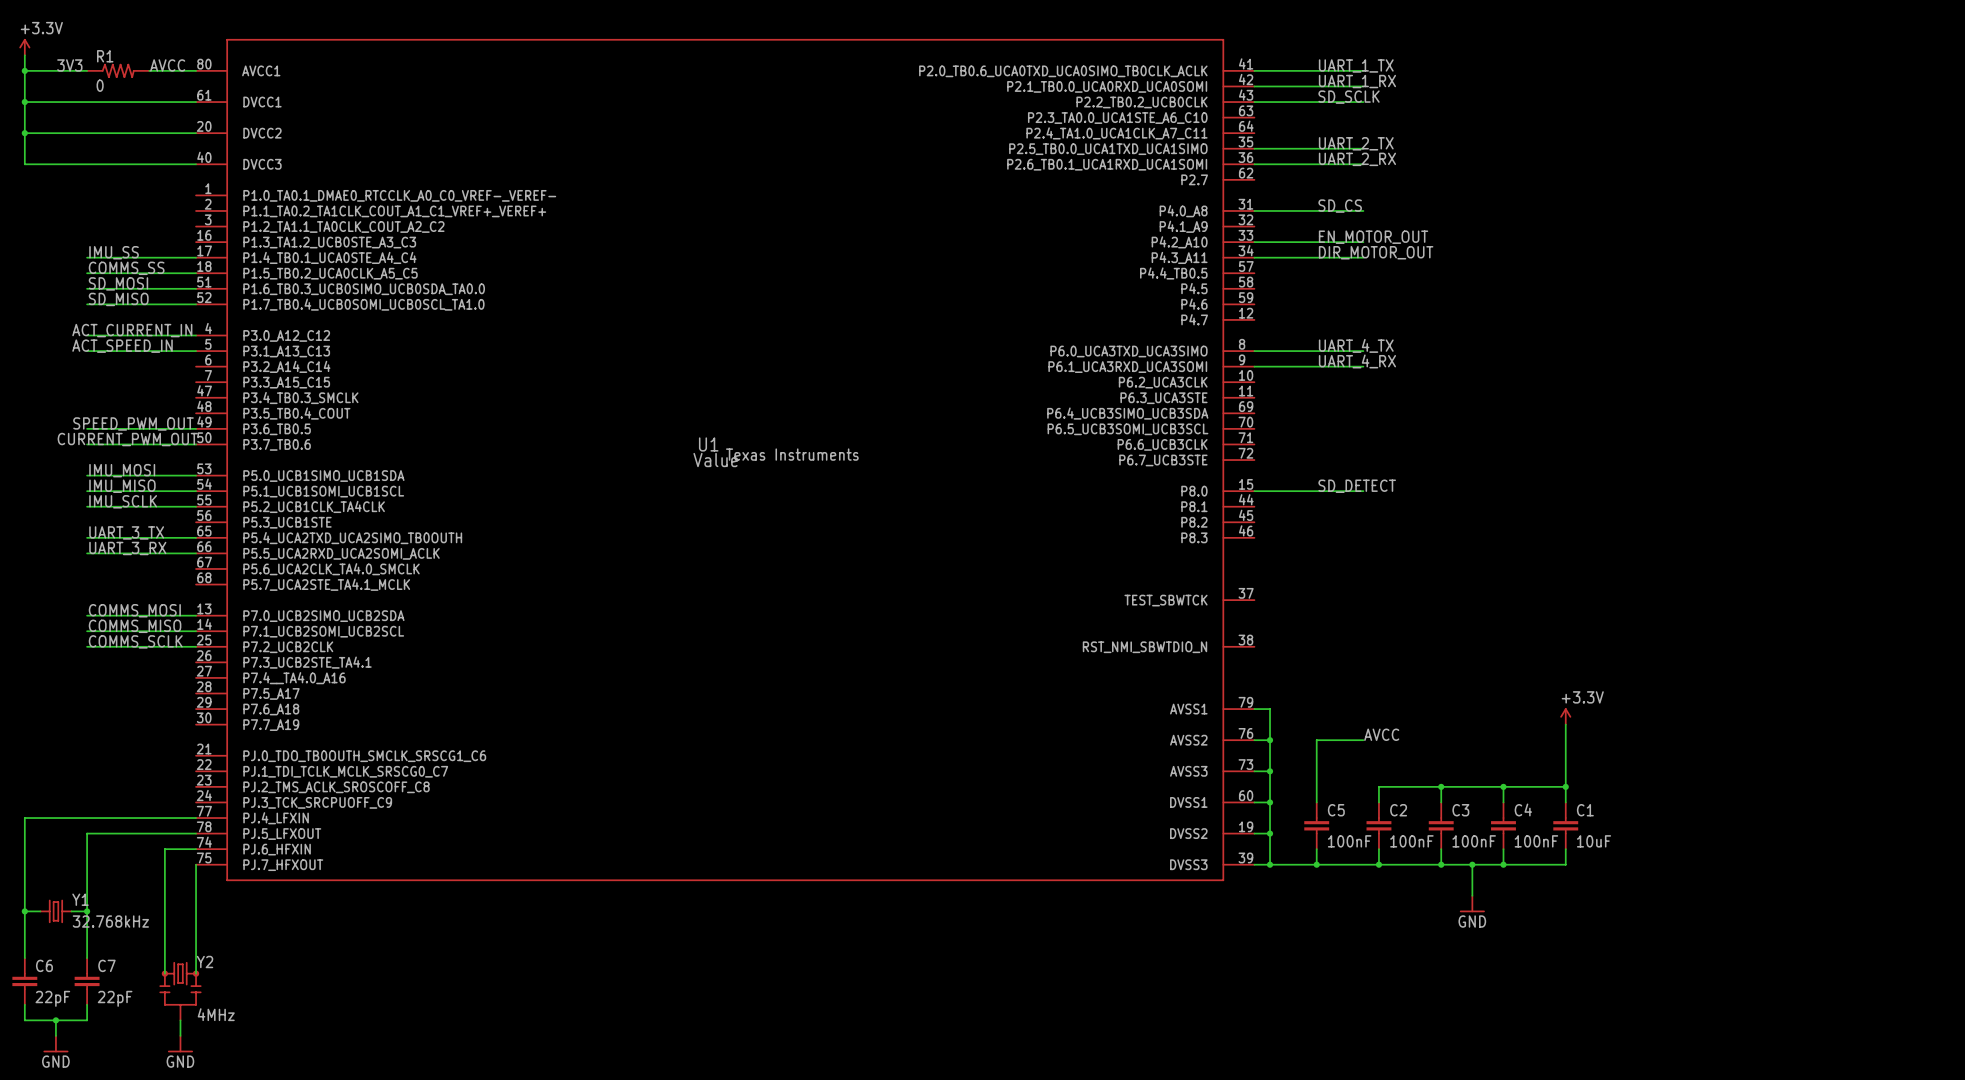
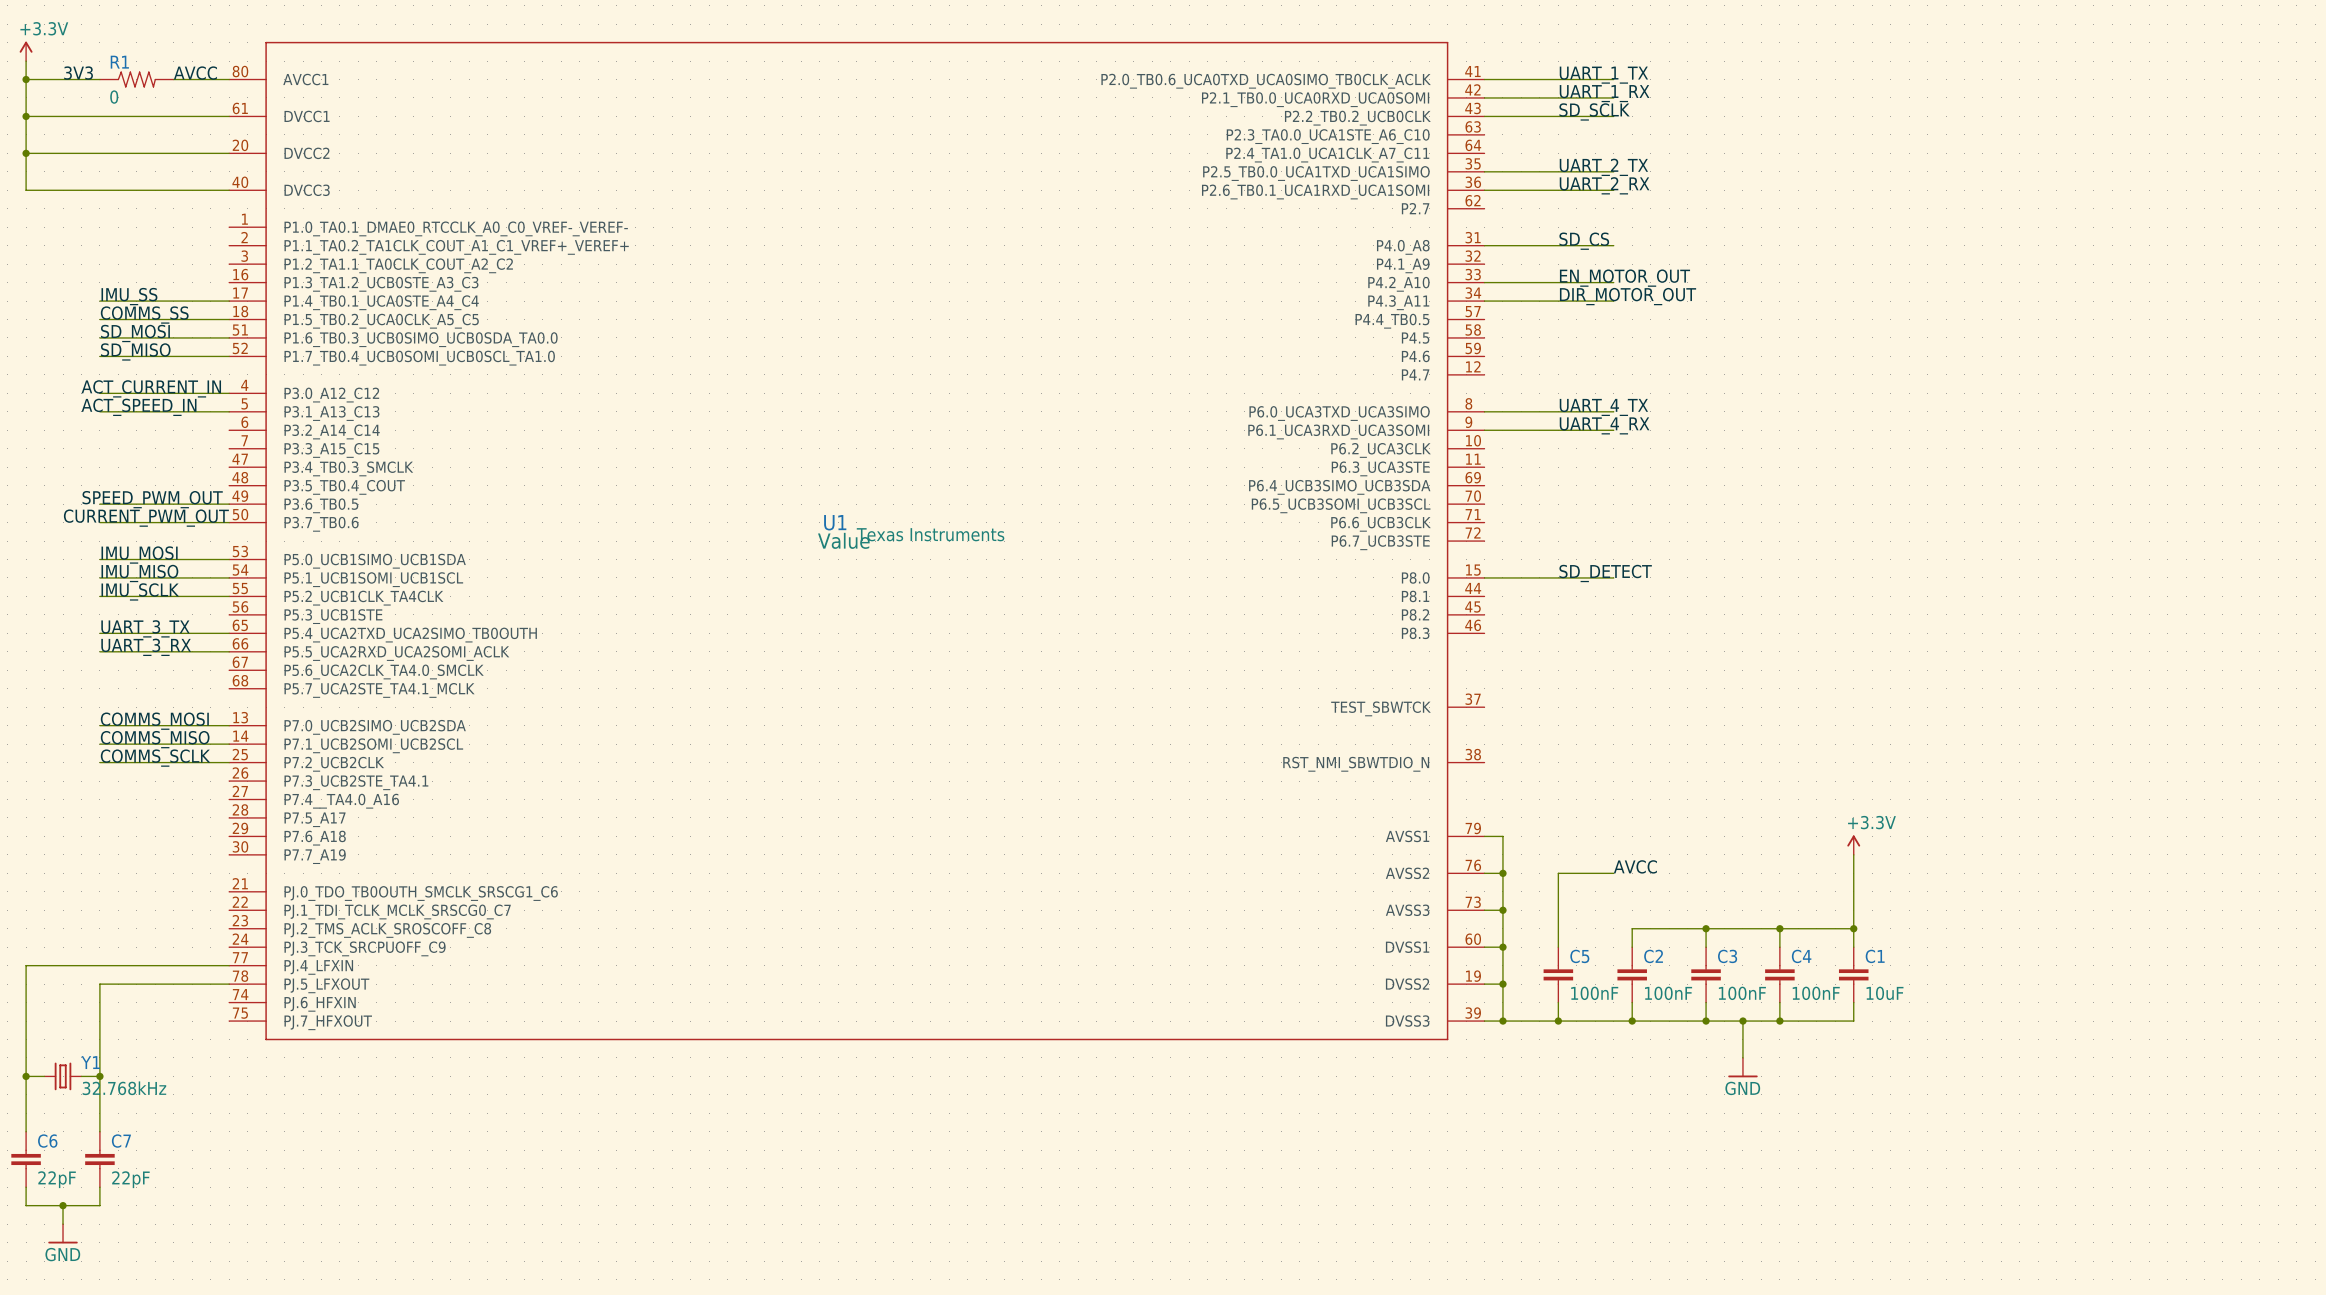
wire: (196, 849) (164, 849) (164, 973) -> none
wire: (196, 864) (196, 973) -> none
Y2: 4MHz (180, 991) -> none
wire: (180, 1020) (180, 1035) -> none
power symbol: GND (180, 1044) -> none

